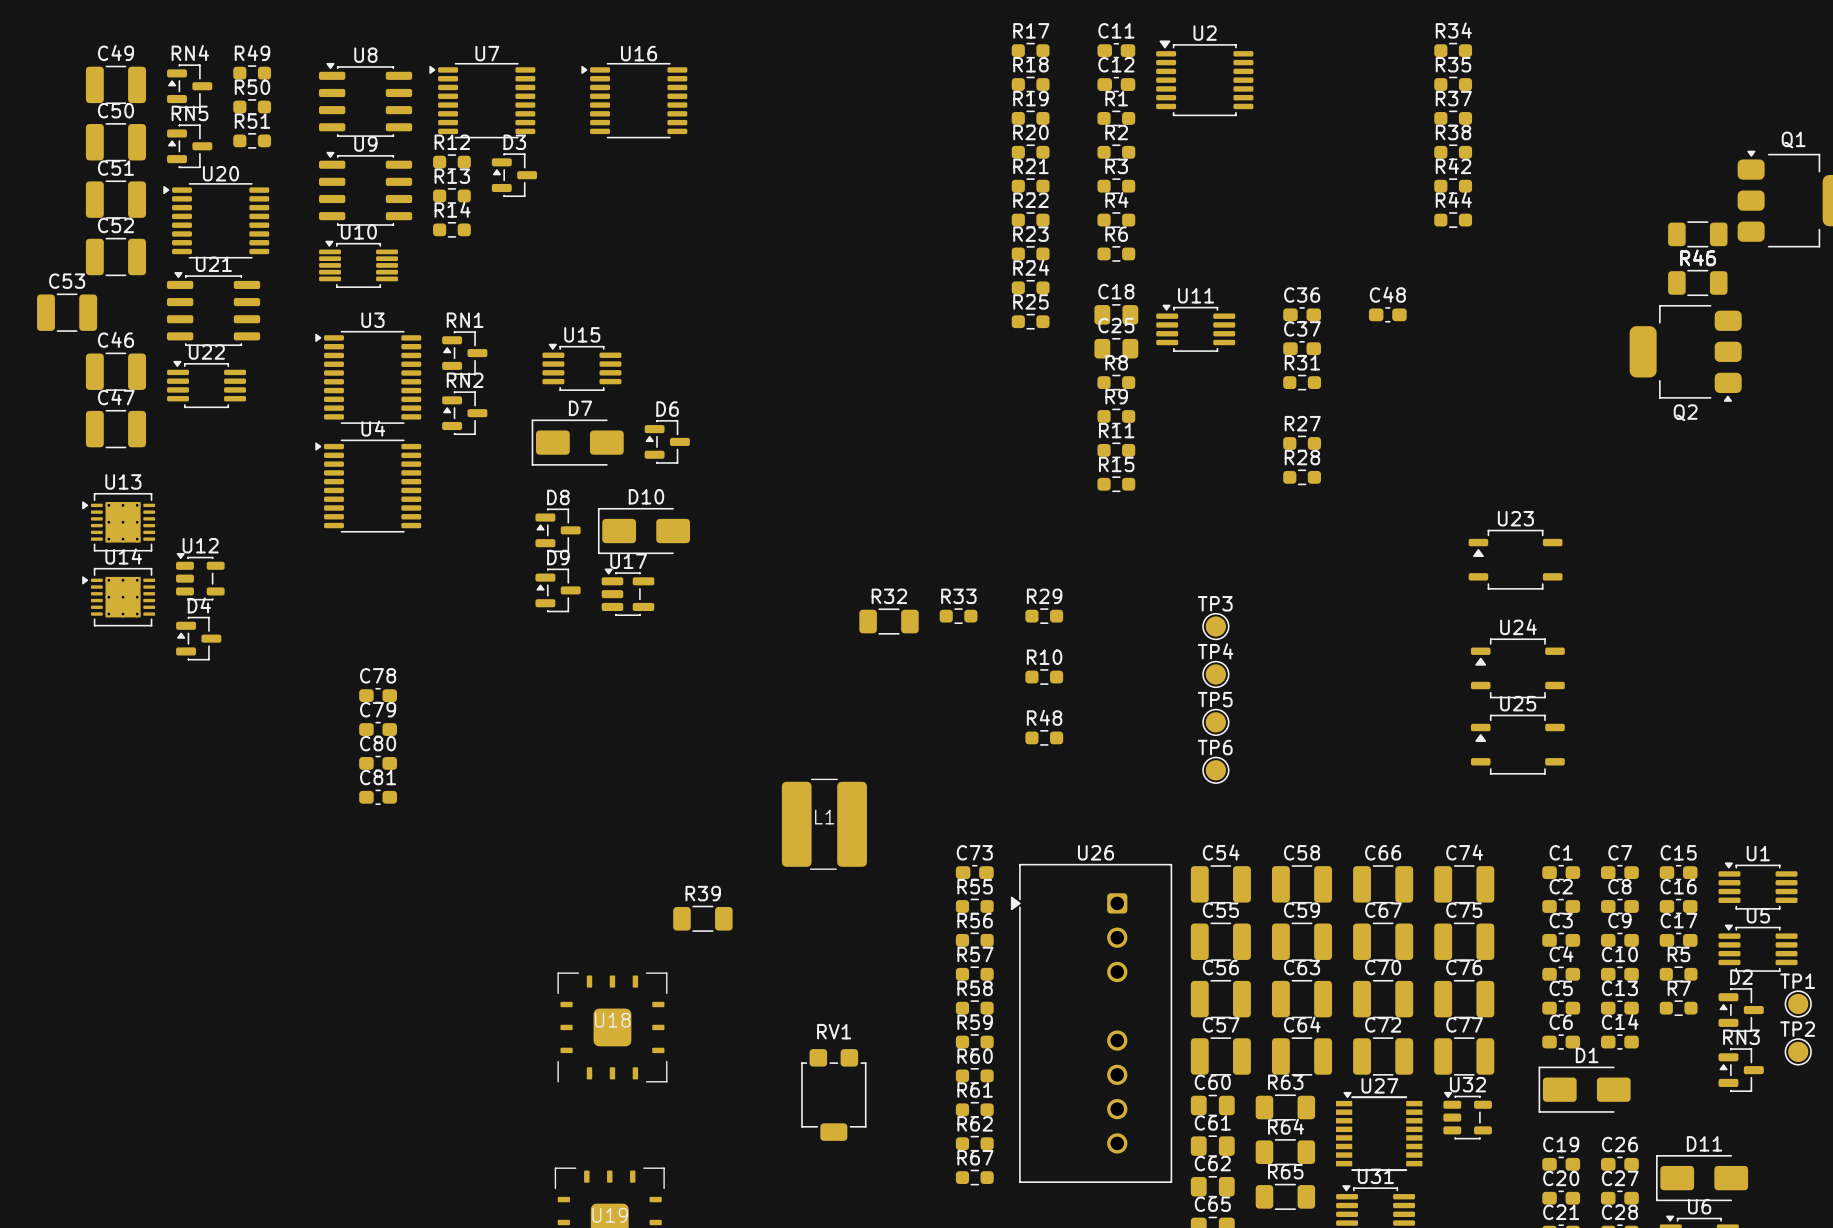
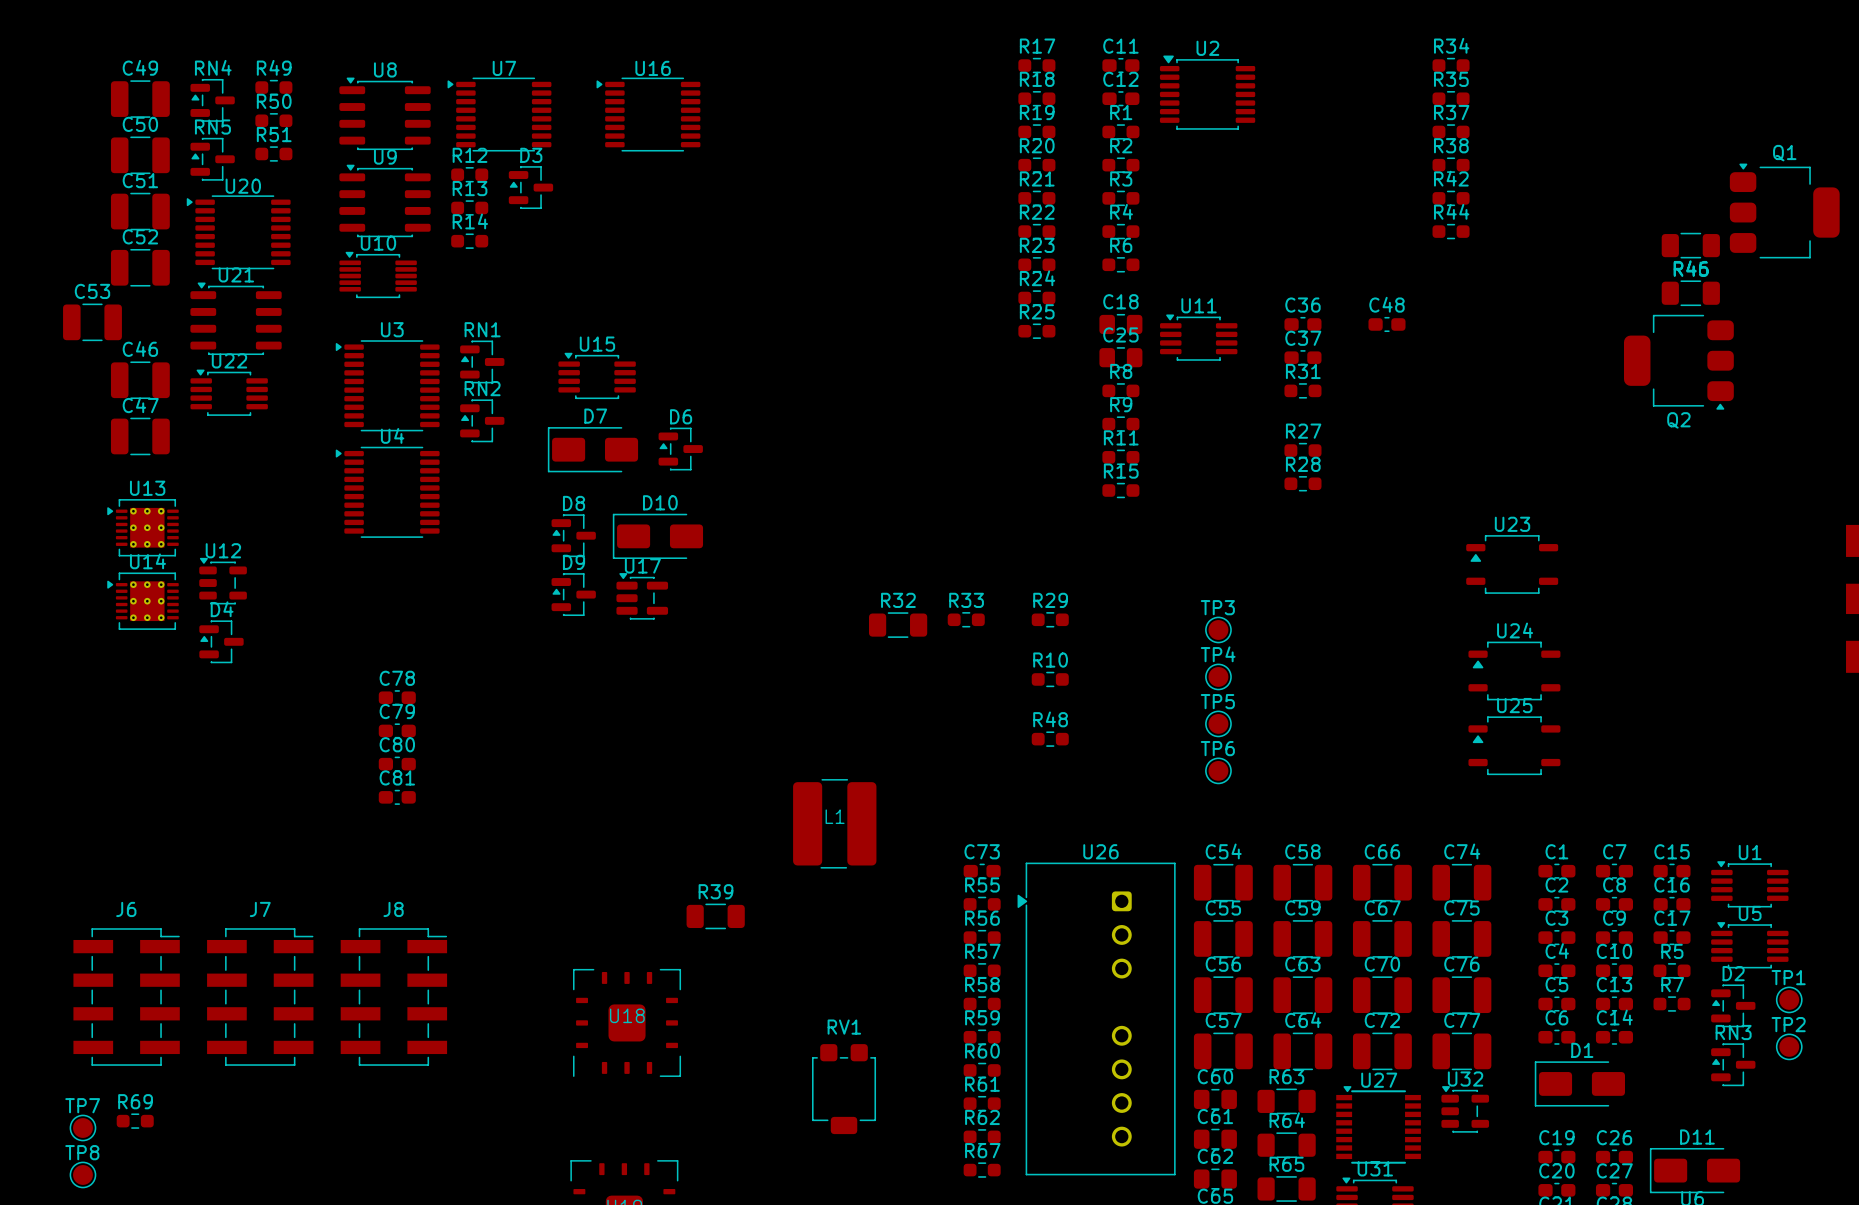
J6: none -> (126, 997)
J7: none -> (260, 997)
J8: none -> (393, 997)
R69: none -> (135, 1121)
TP7: none -> (82, 1128)
TP8: none -> (82, 1174)

